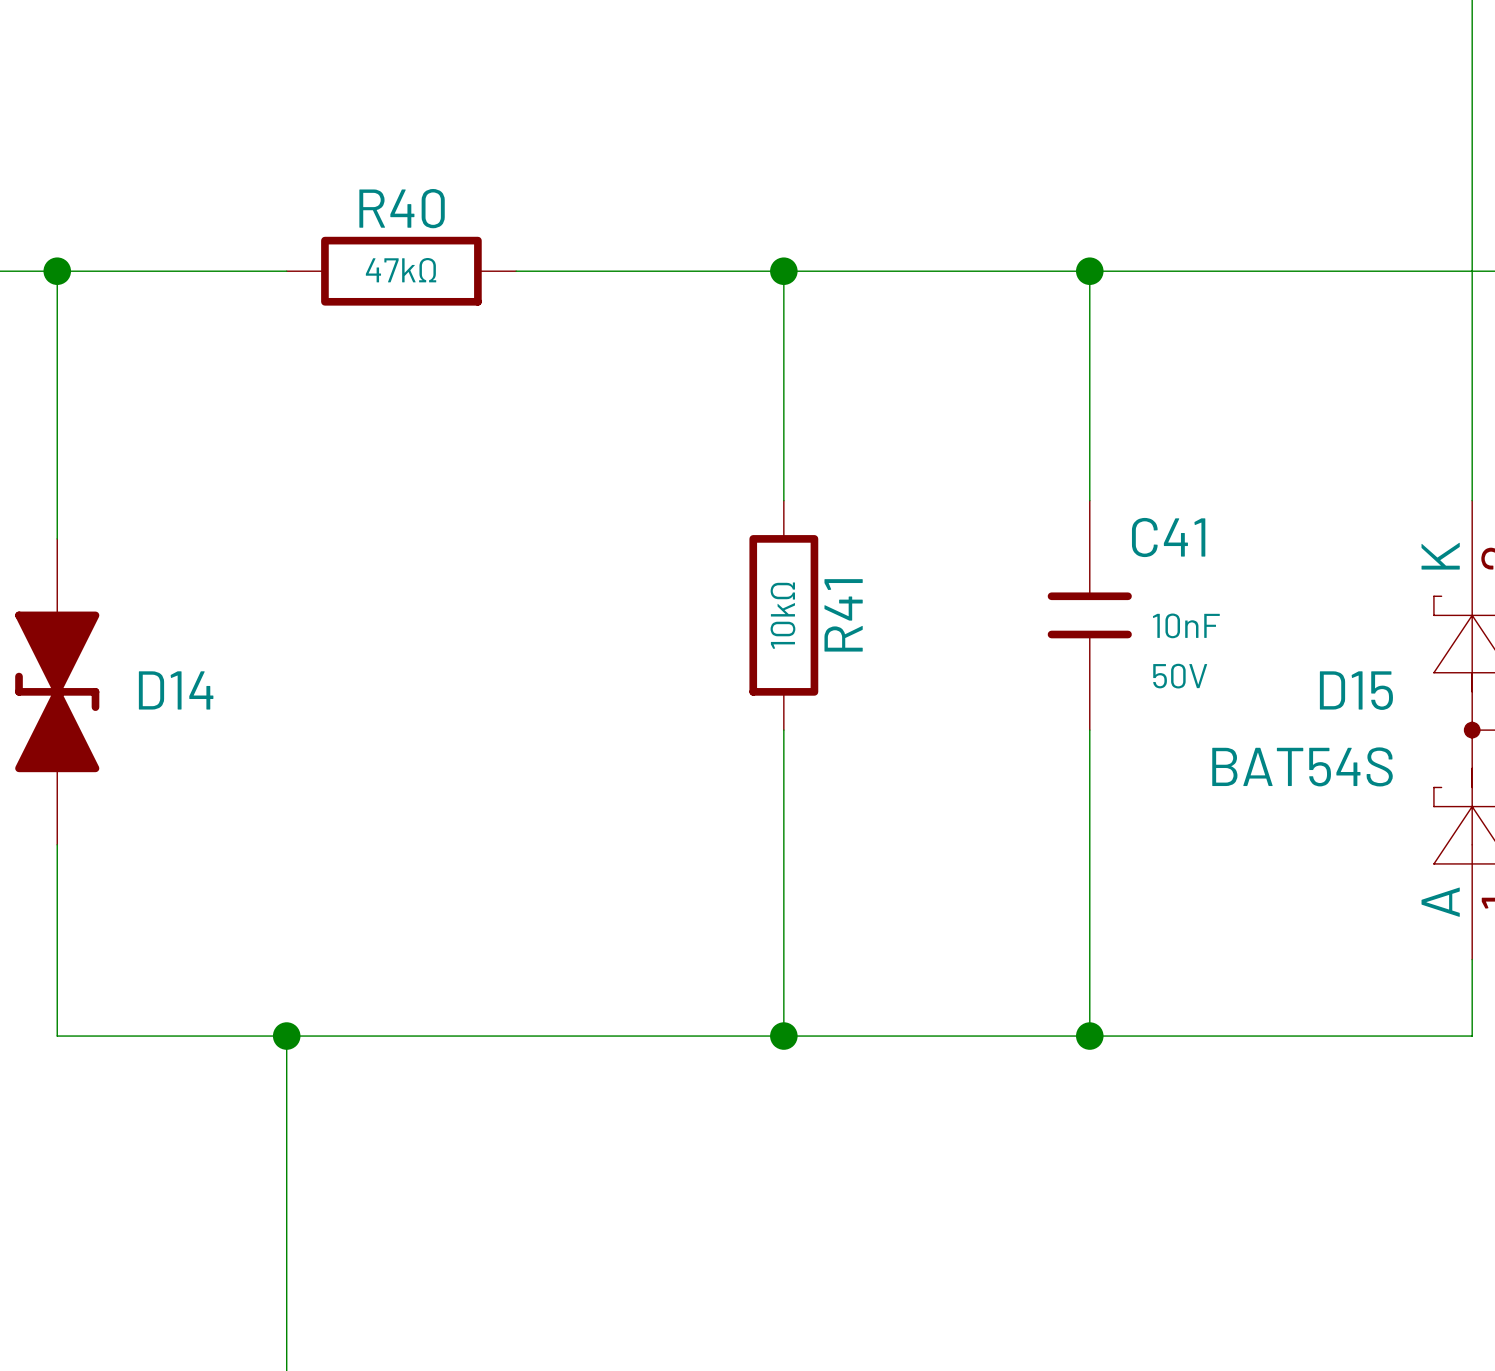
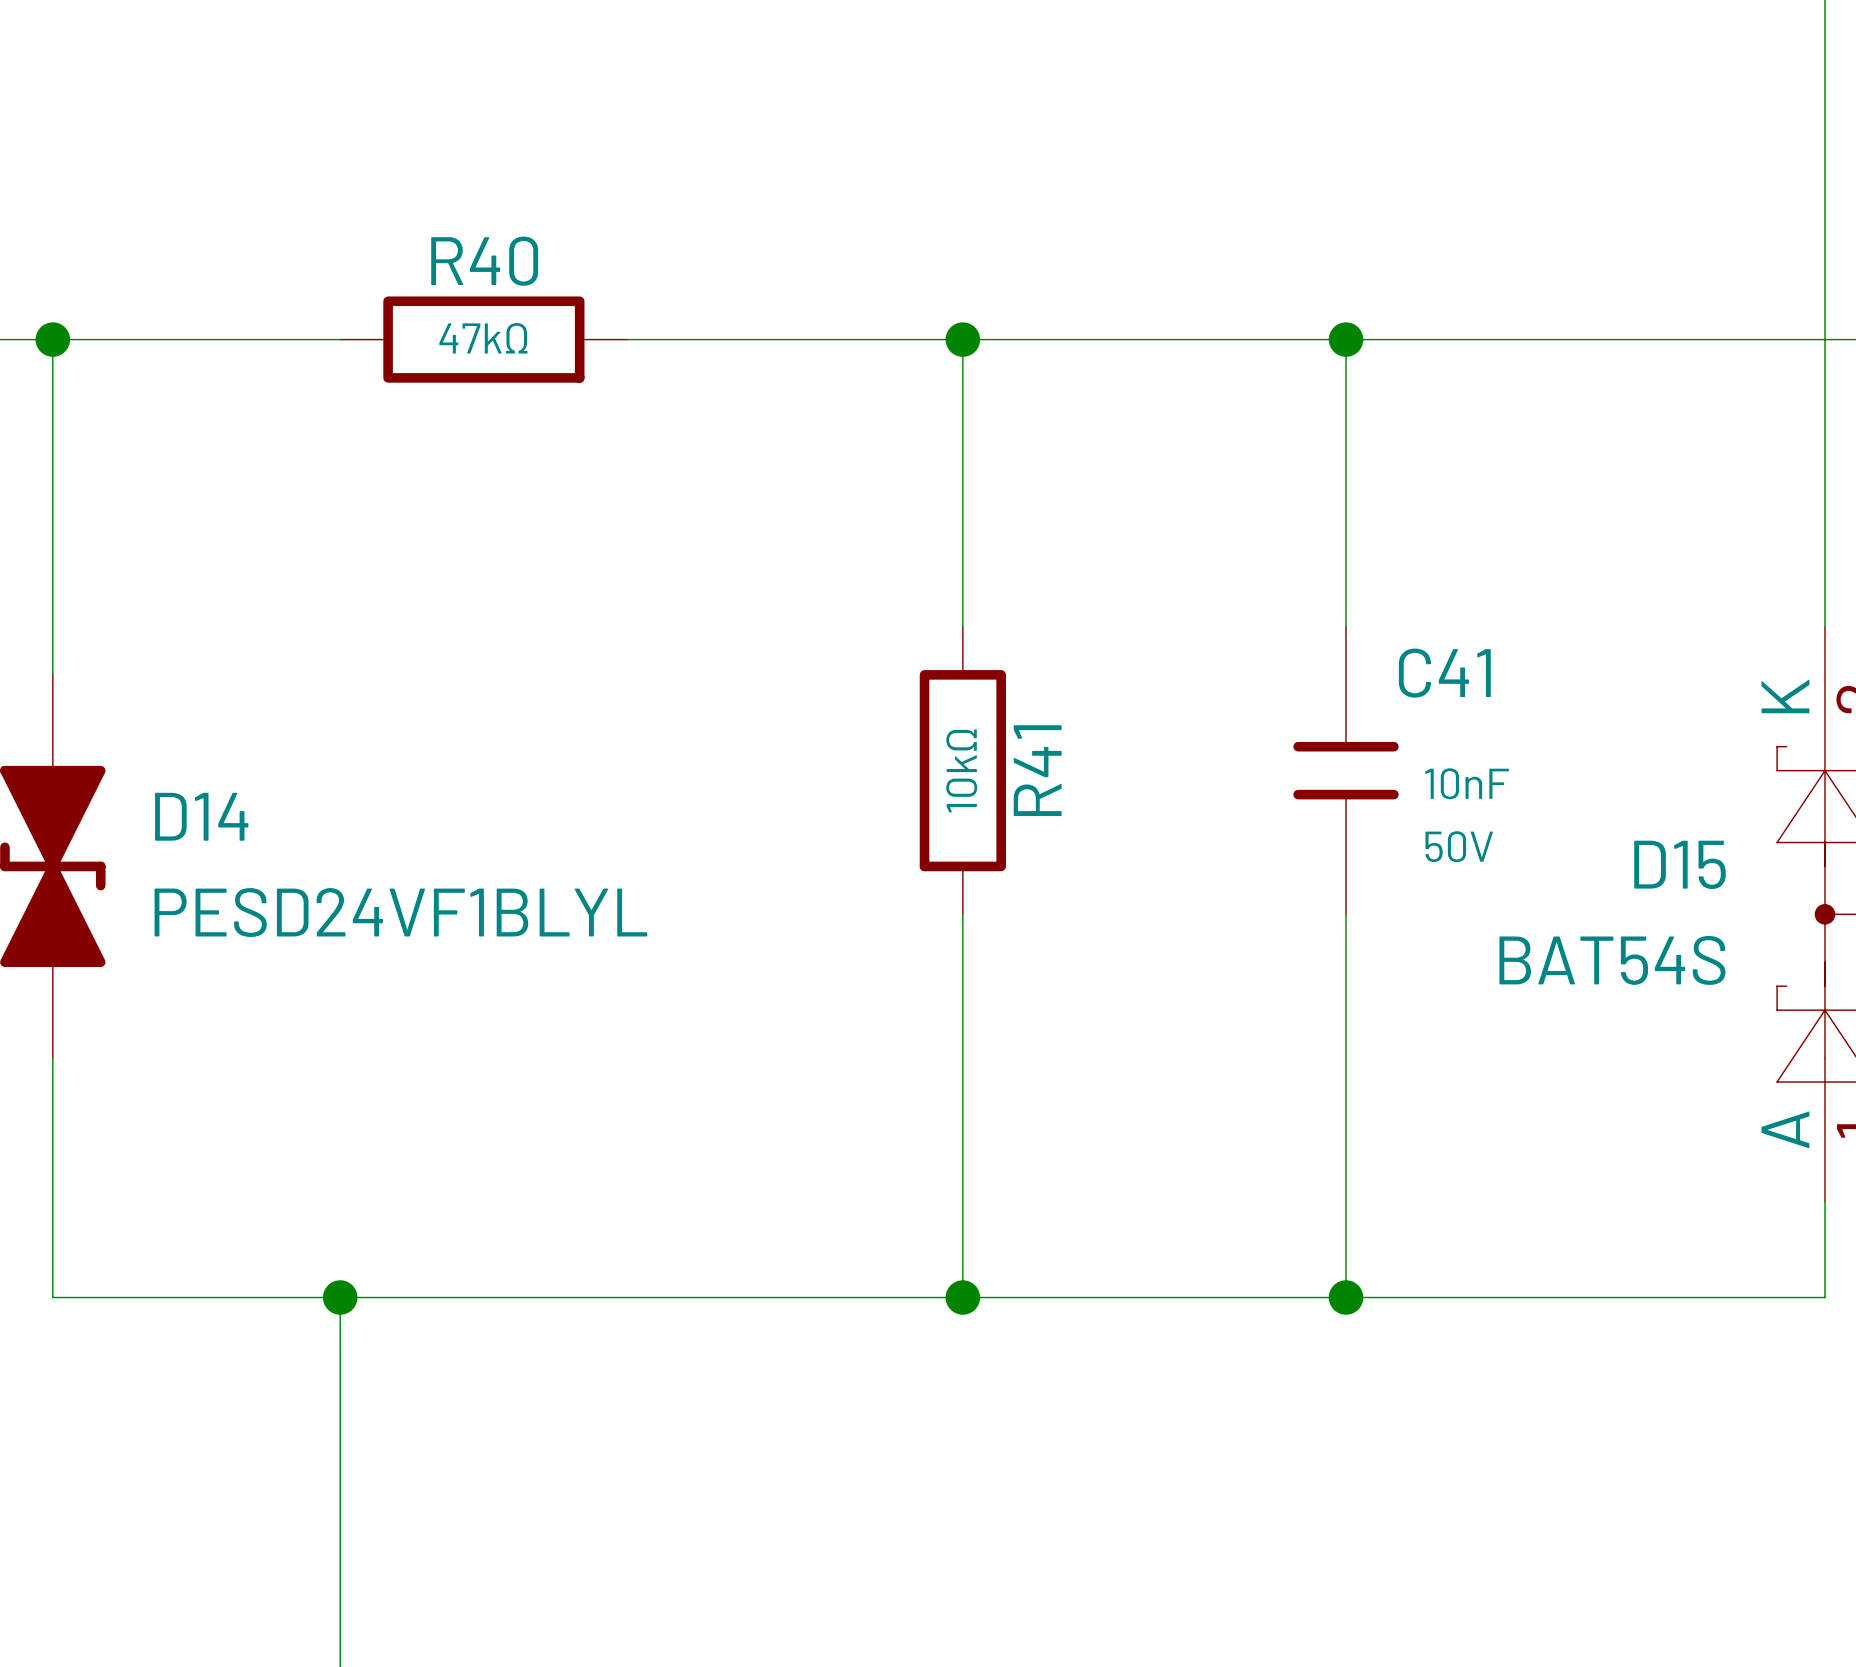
D14 name position: D14 (176, 690) -> D14 (201, 816)
D14 value: none -> PESD24VF1BLYL (400, 912)

